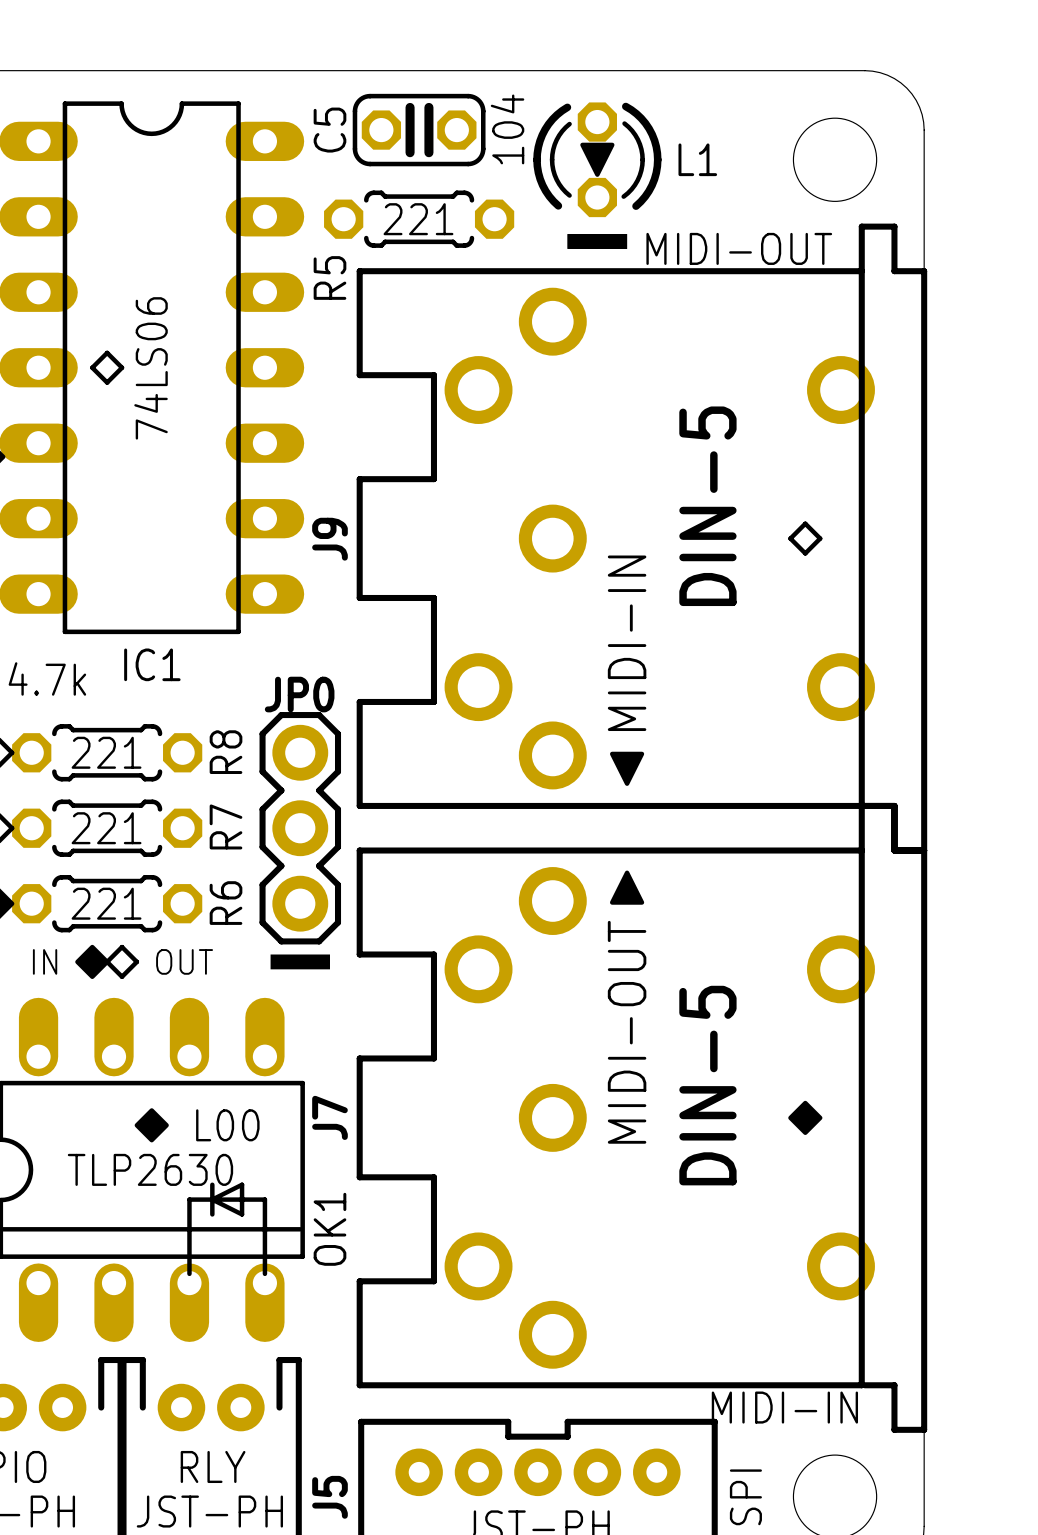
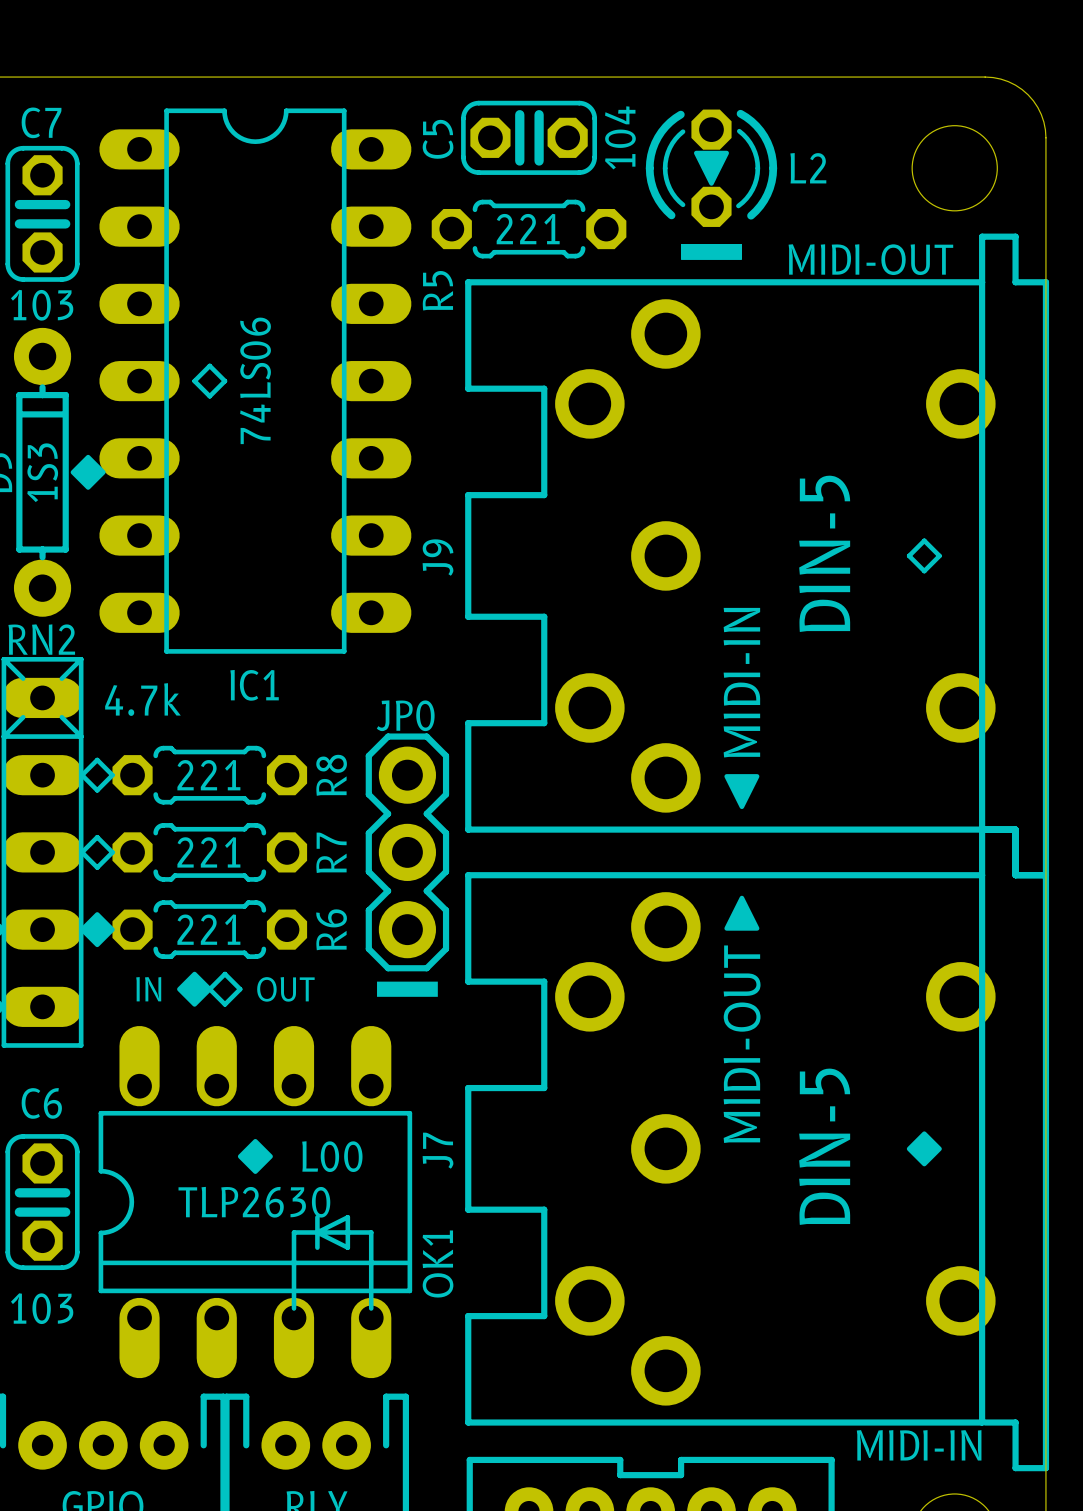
L1 name: L1 (697, 159) -> L2 (808, 168)

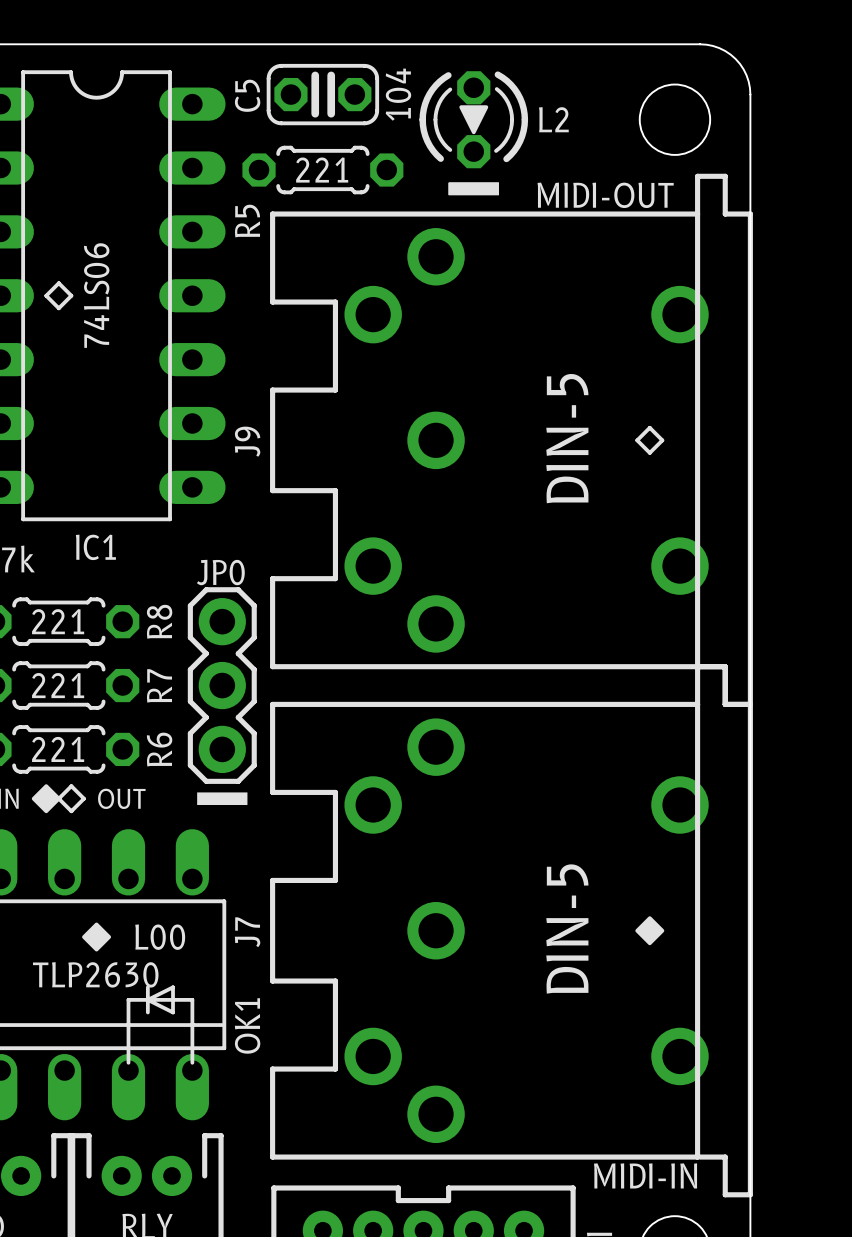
text: MIDI-IN (741, 682) -> none
drawing: [724, 774, 760, 810] -> none
drawing: [724, 895, 760, 931] -> none
text: MIDI-OUT (742, 1044) -> none

